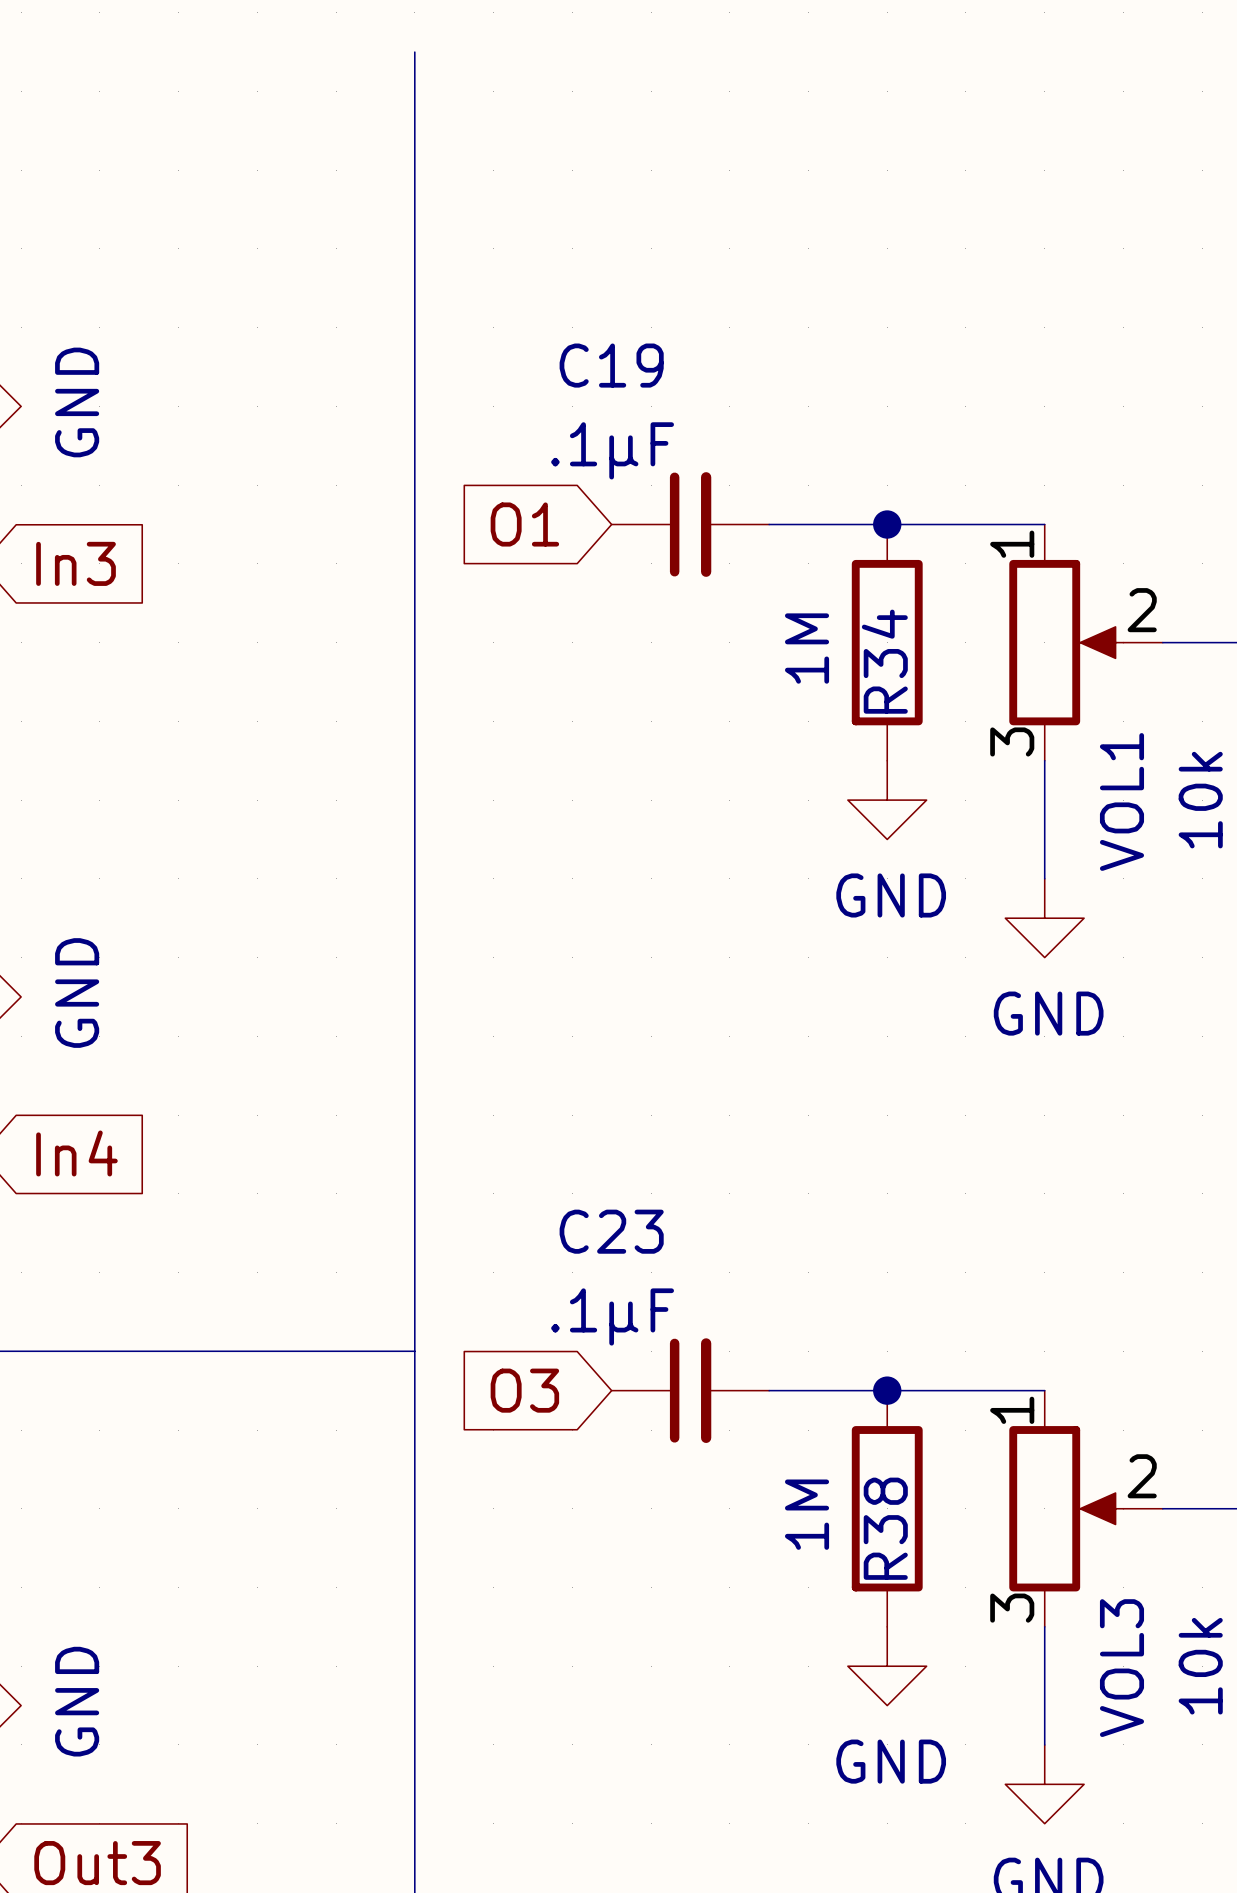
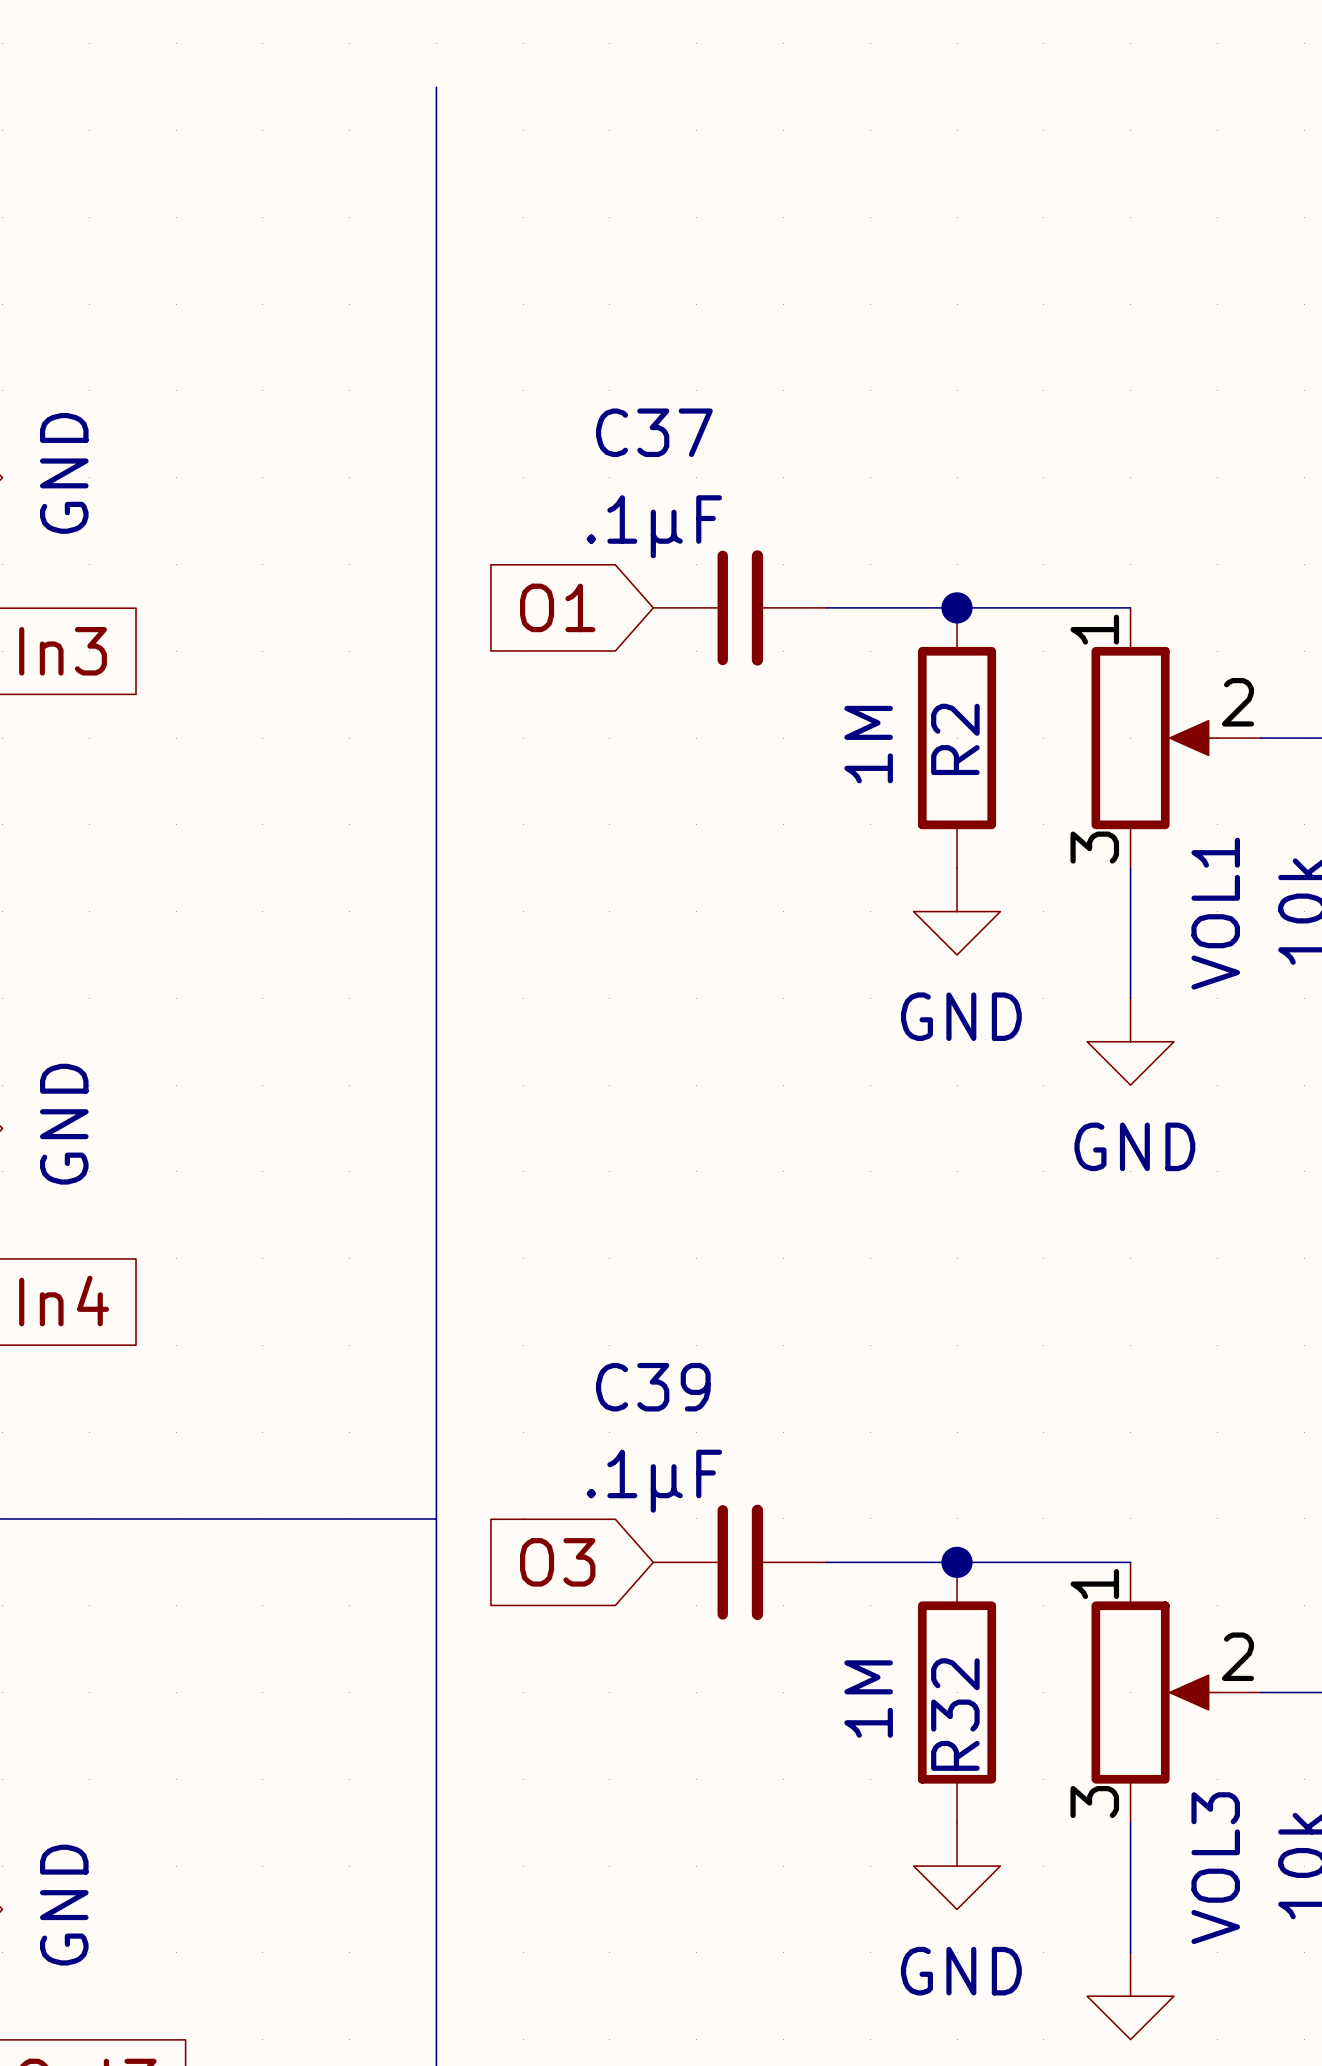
C19 name: C19 (611, 365) -> C37 (654, 432)
R34 name: R34 (884, 661) -> R2 (955, 739)
C23 name: C23 (611, 1231) -> C39 (653, 1387)
R38 name: R38 (885, 1528) -> R32 (955, 1714)

